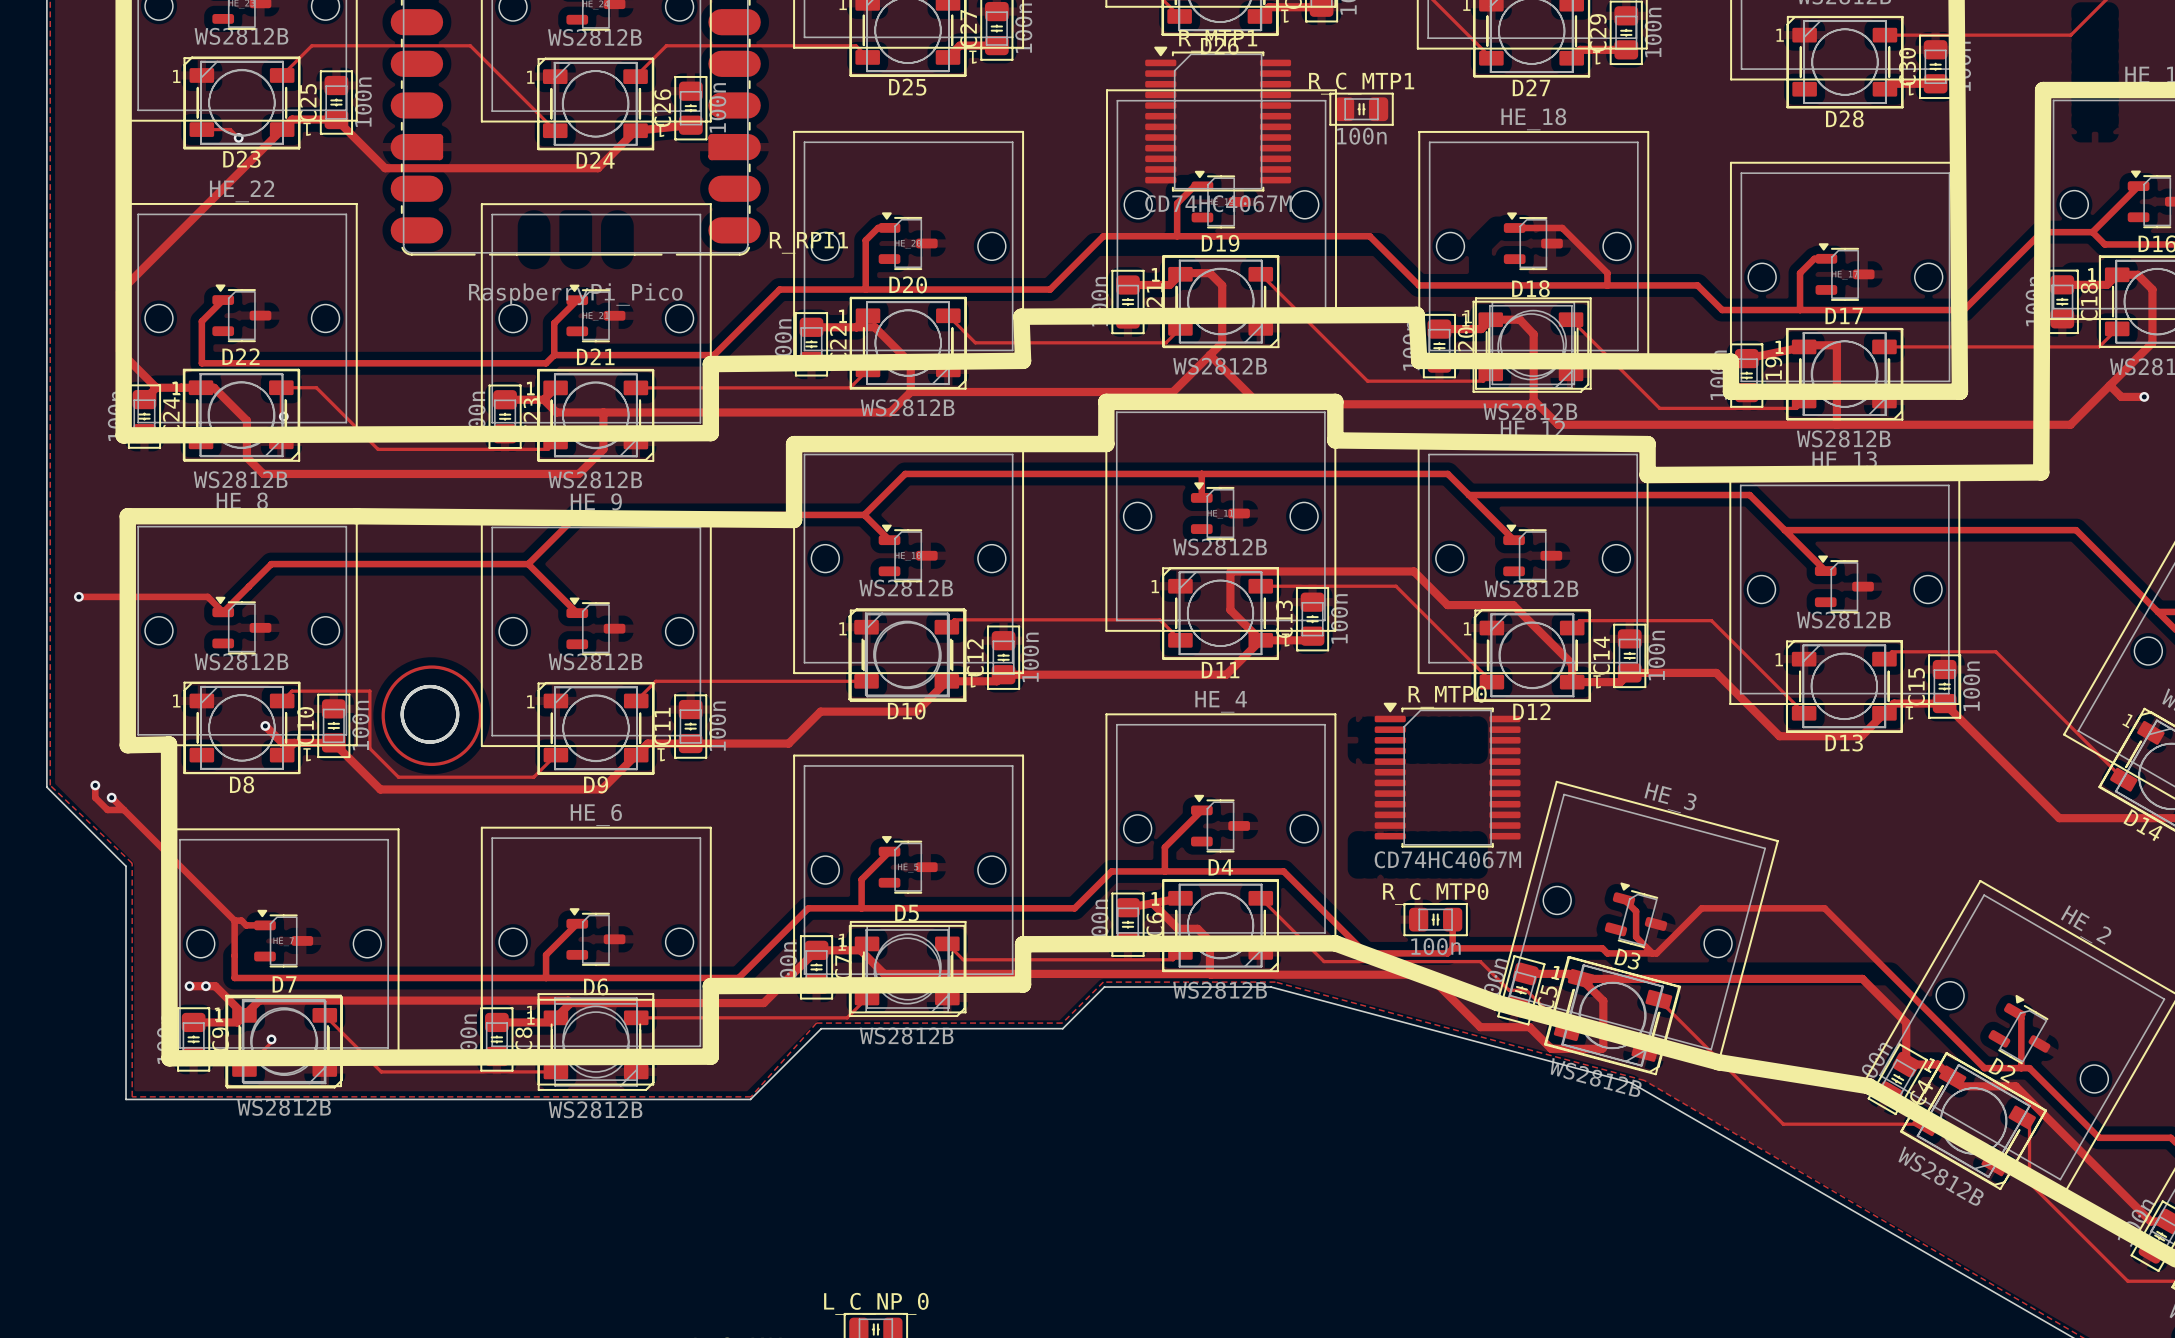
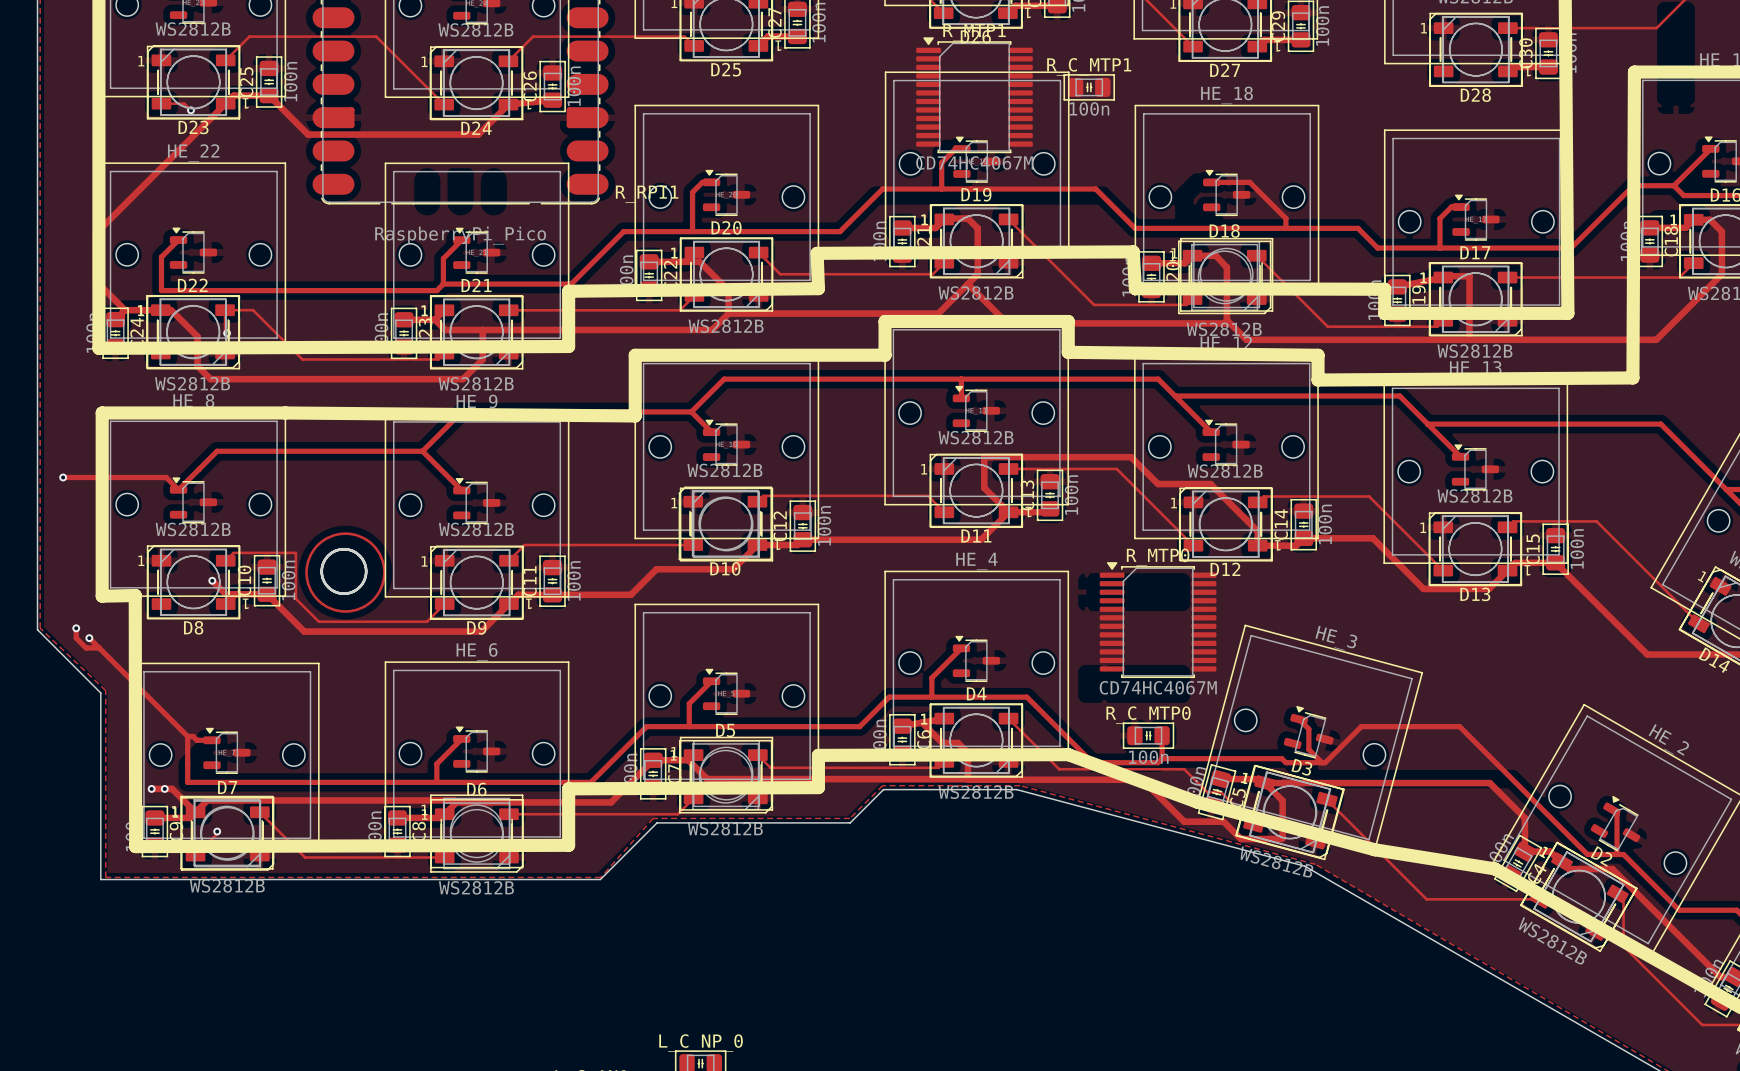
track: (2109, 385) (2121, 396) (2144, 396) -> none
via: (2144, 396) -> none

